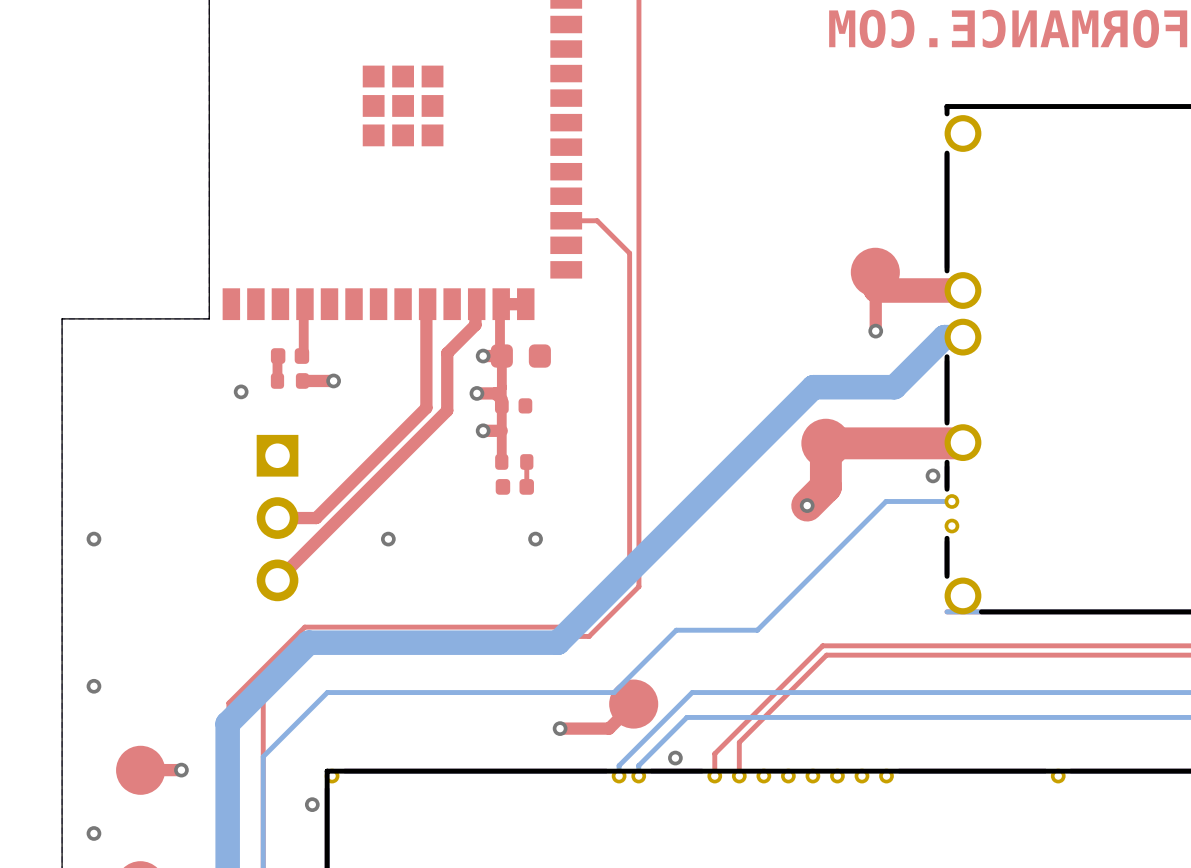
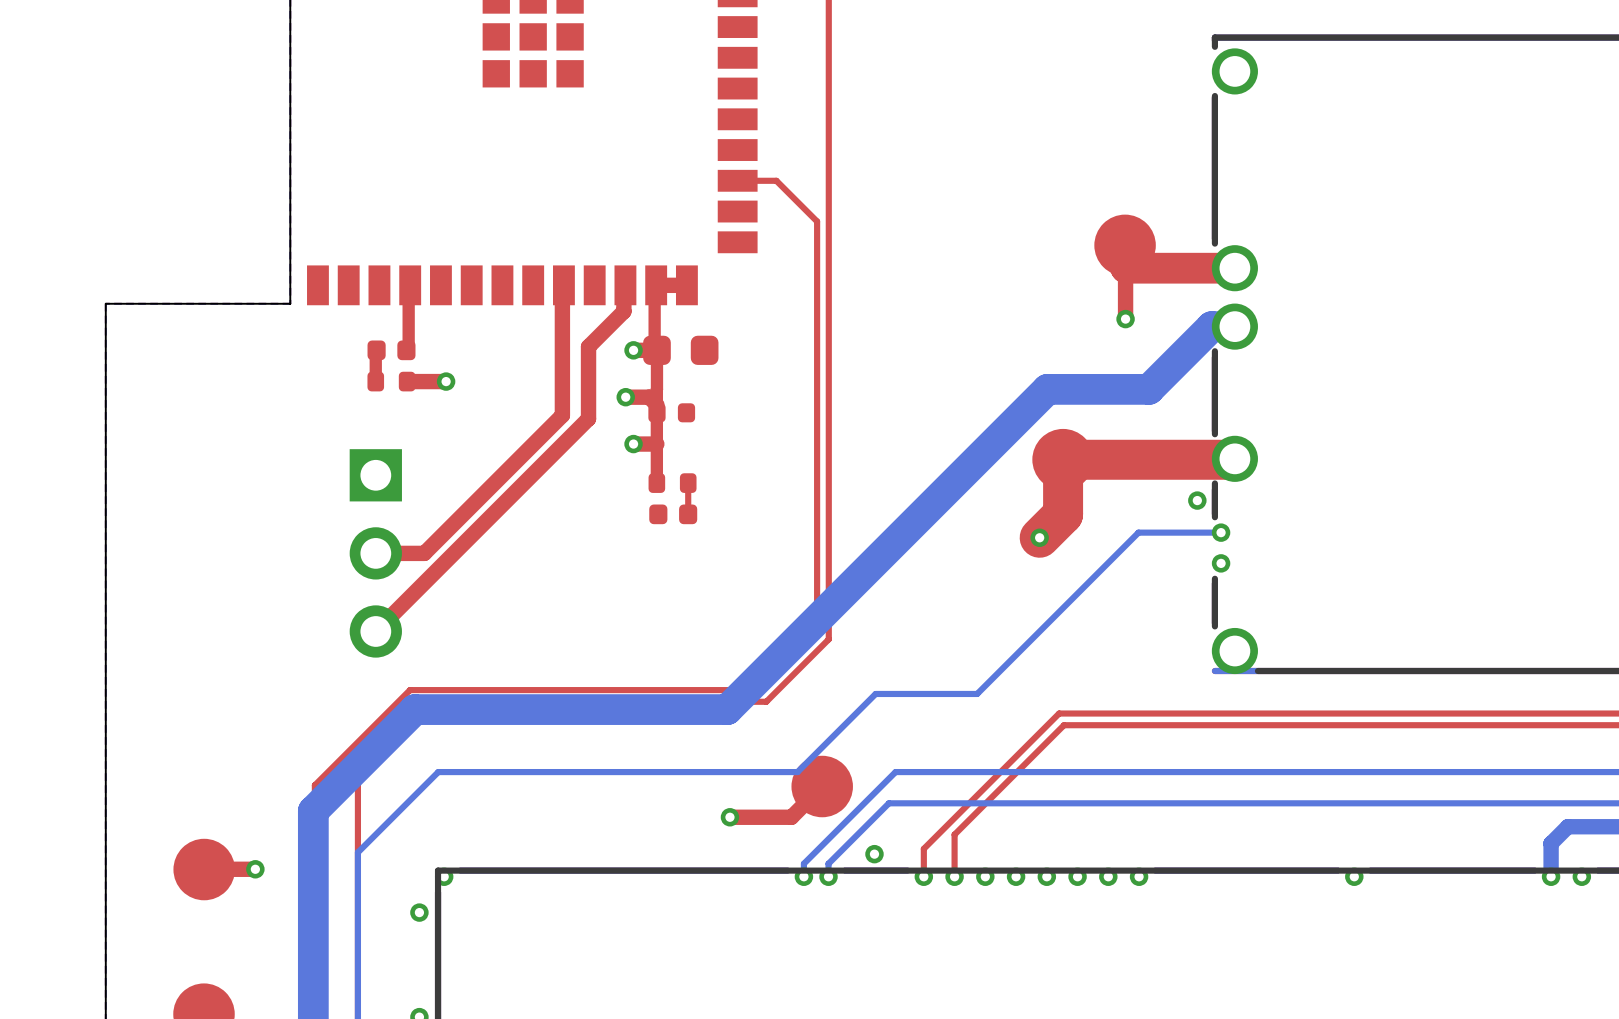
via: (241, 391) -> none
via: (93, 539) -> none
via: (388, 539) -> none
via: (535, 539) -> none
via: (93, 686) -> none
via: (93, 833) -> none

